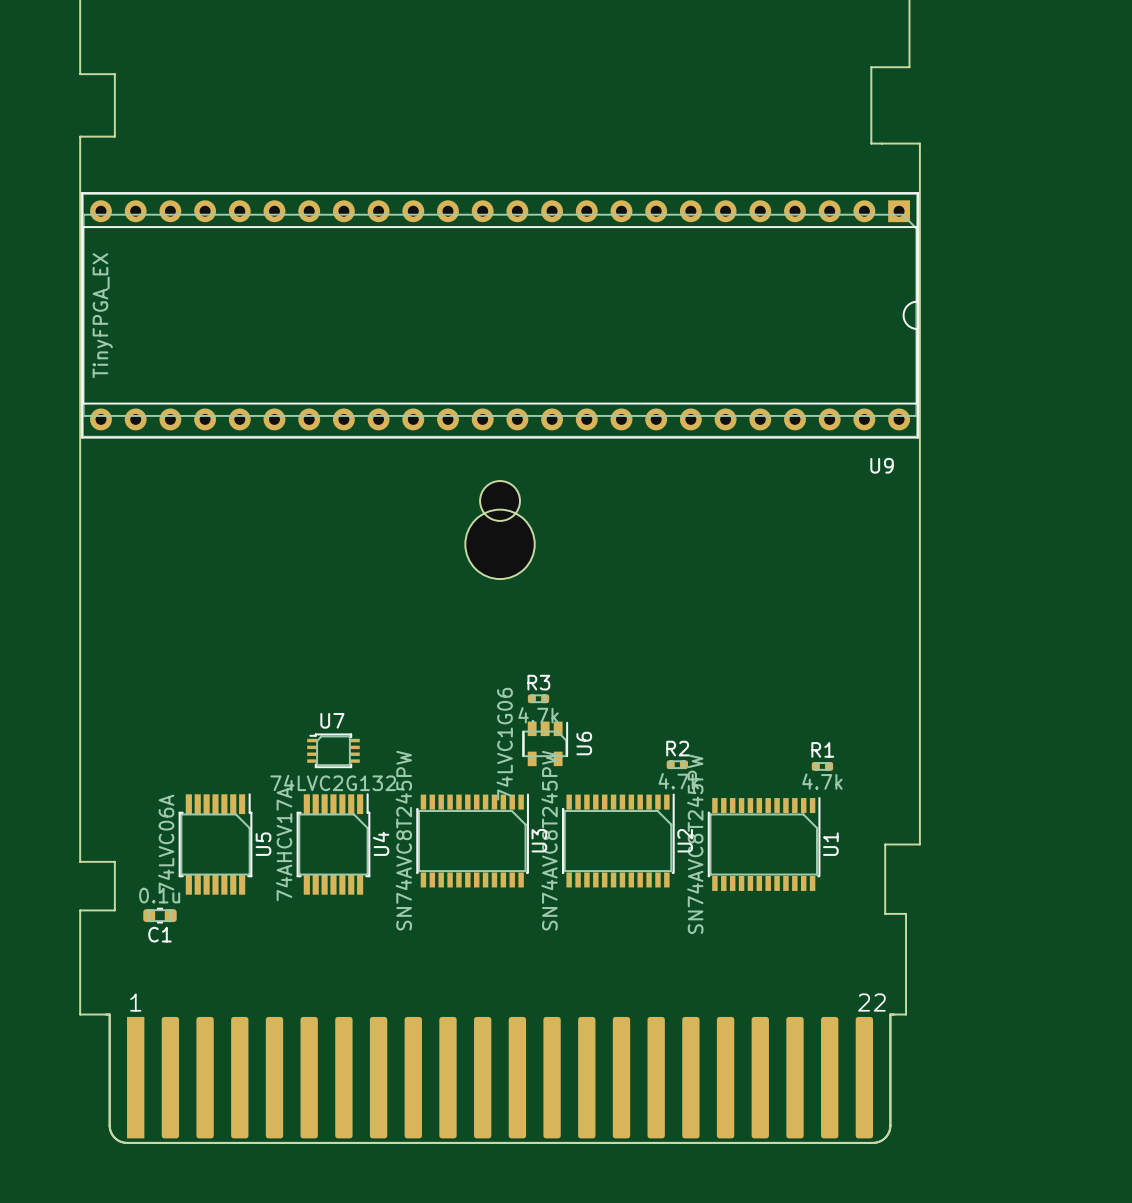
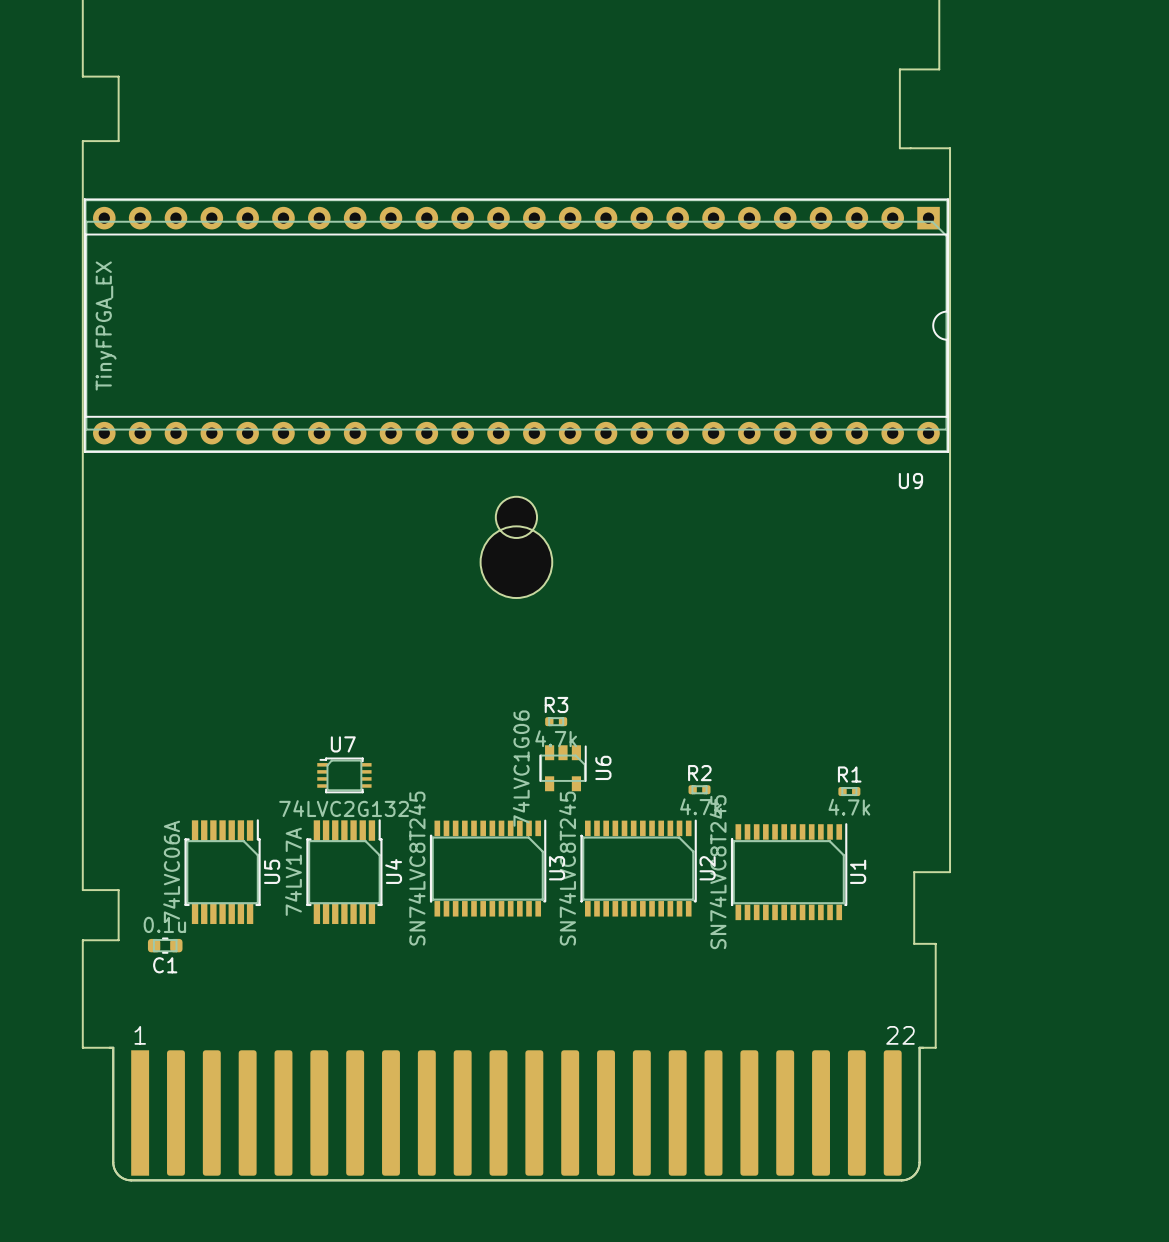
U3 value: SN74AVC8T245PW (403, 840) -> SN74LVC8T245 (417, 868)
U2 value: SN74AVC8T245PW (549, 840) -> SN74LVC8T245 (567, 868)
U4 value: 74AHCV17A (284, 844) -> 74LV17A (293, 871)
U1 value: SN74AVC8T245PW (695, 844) -> SN74LVC8T245 (718, 872)

